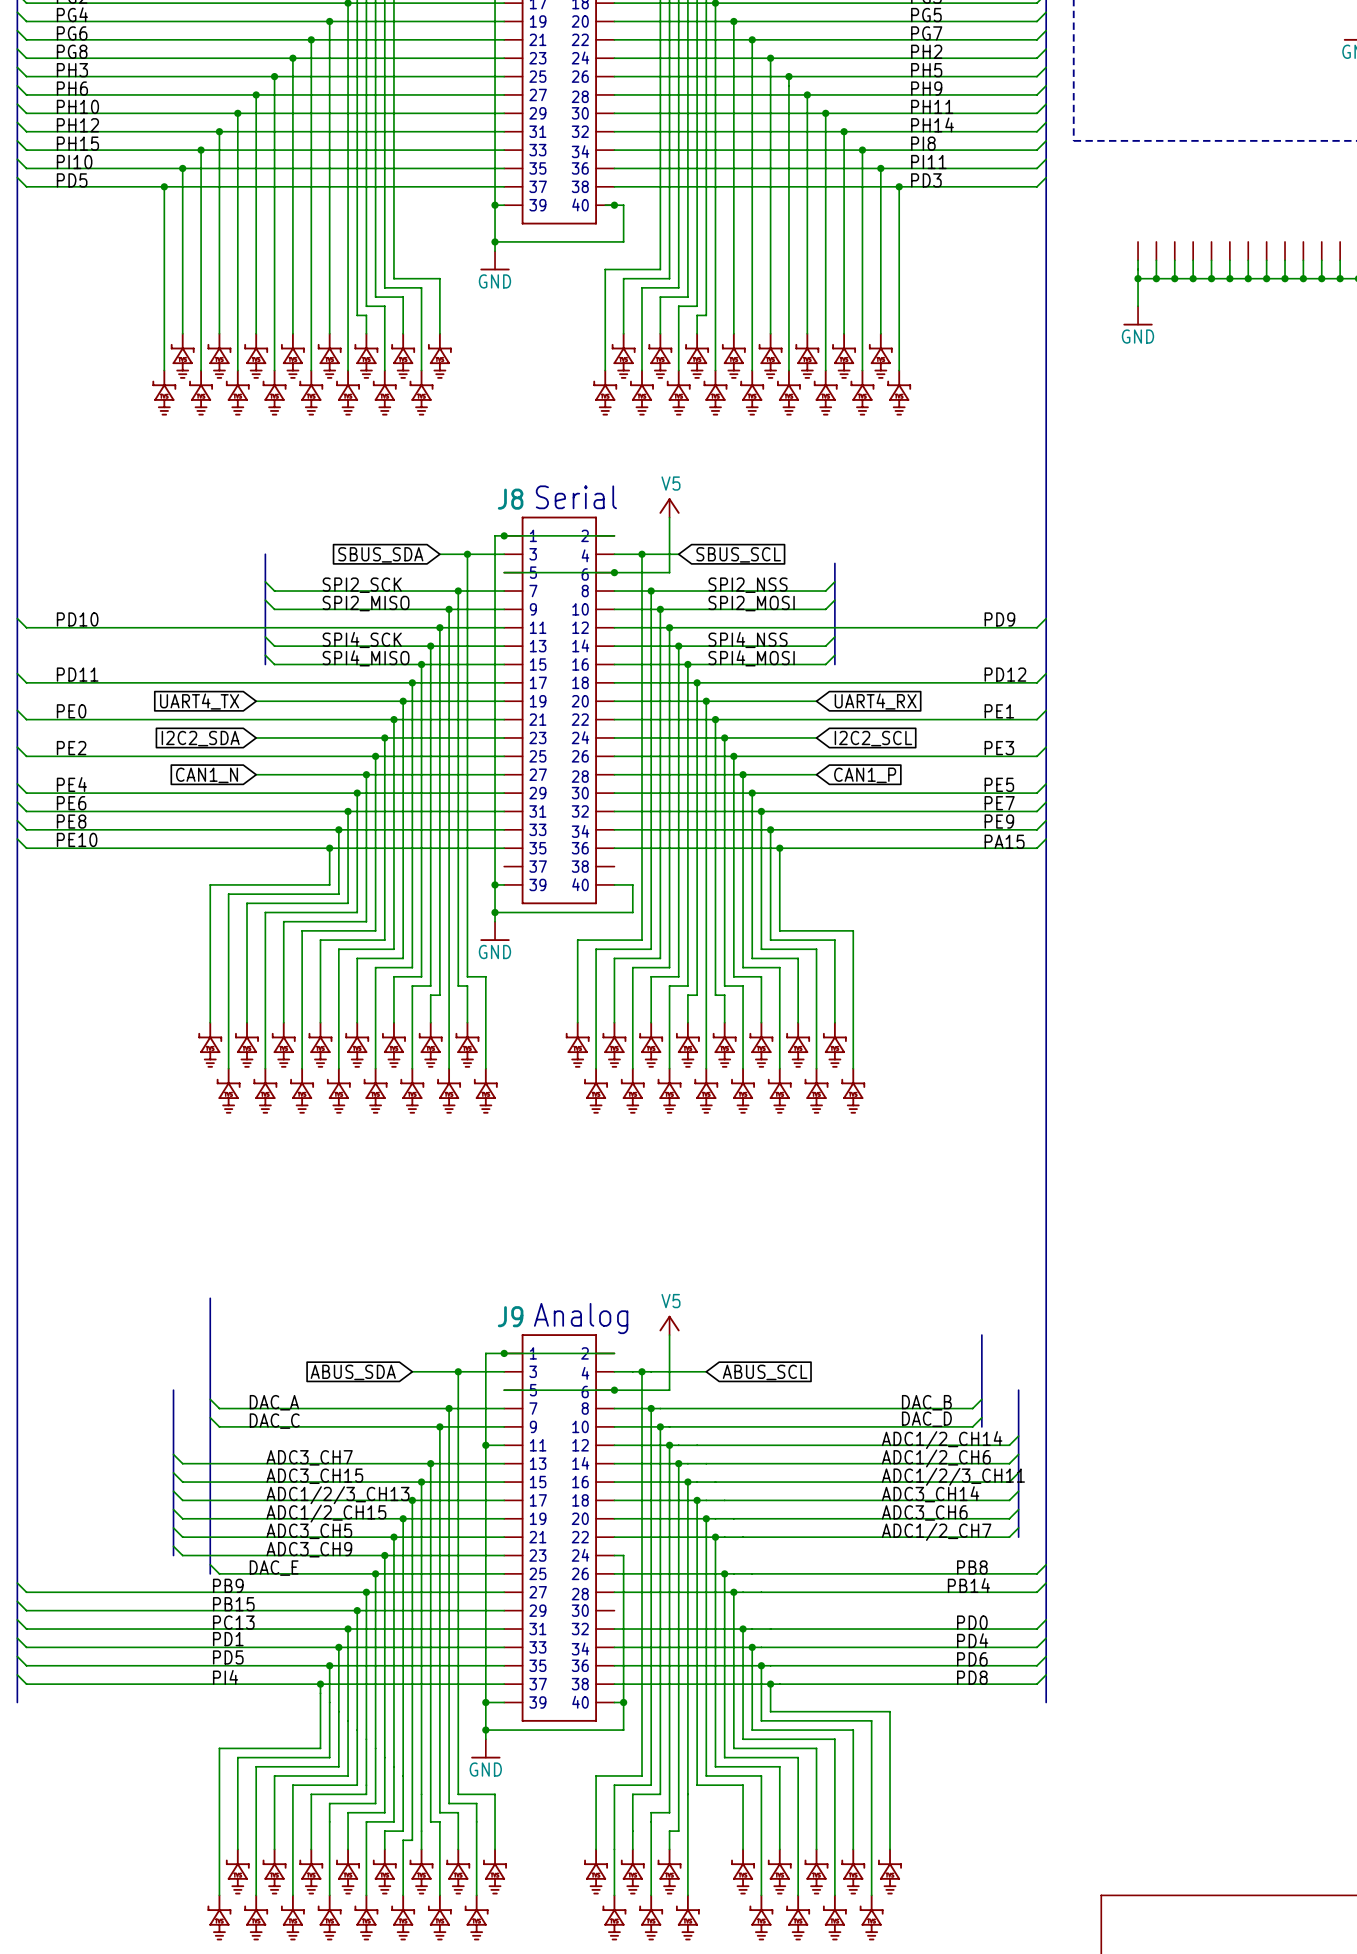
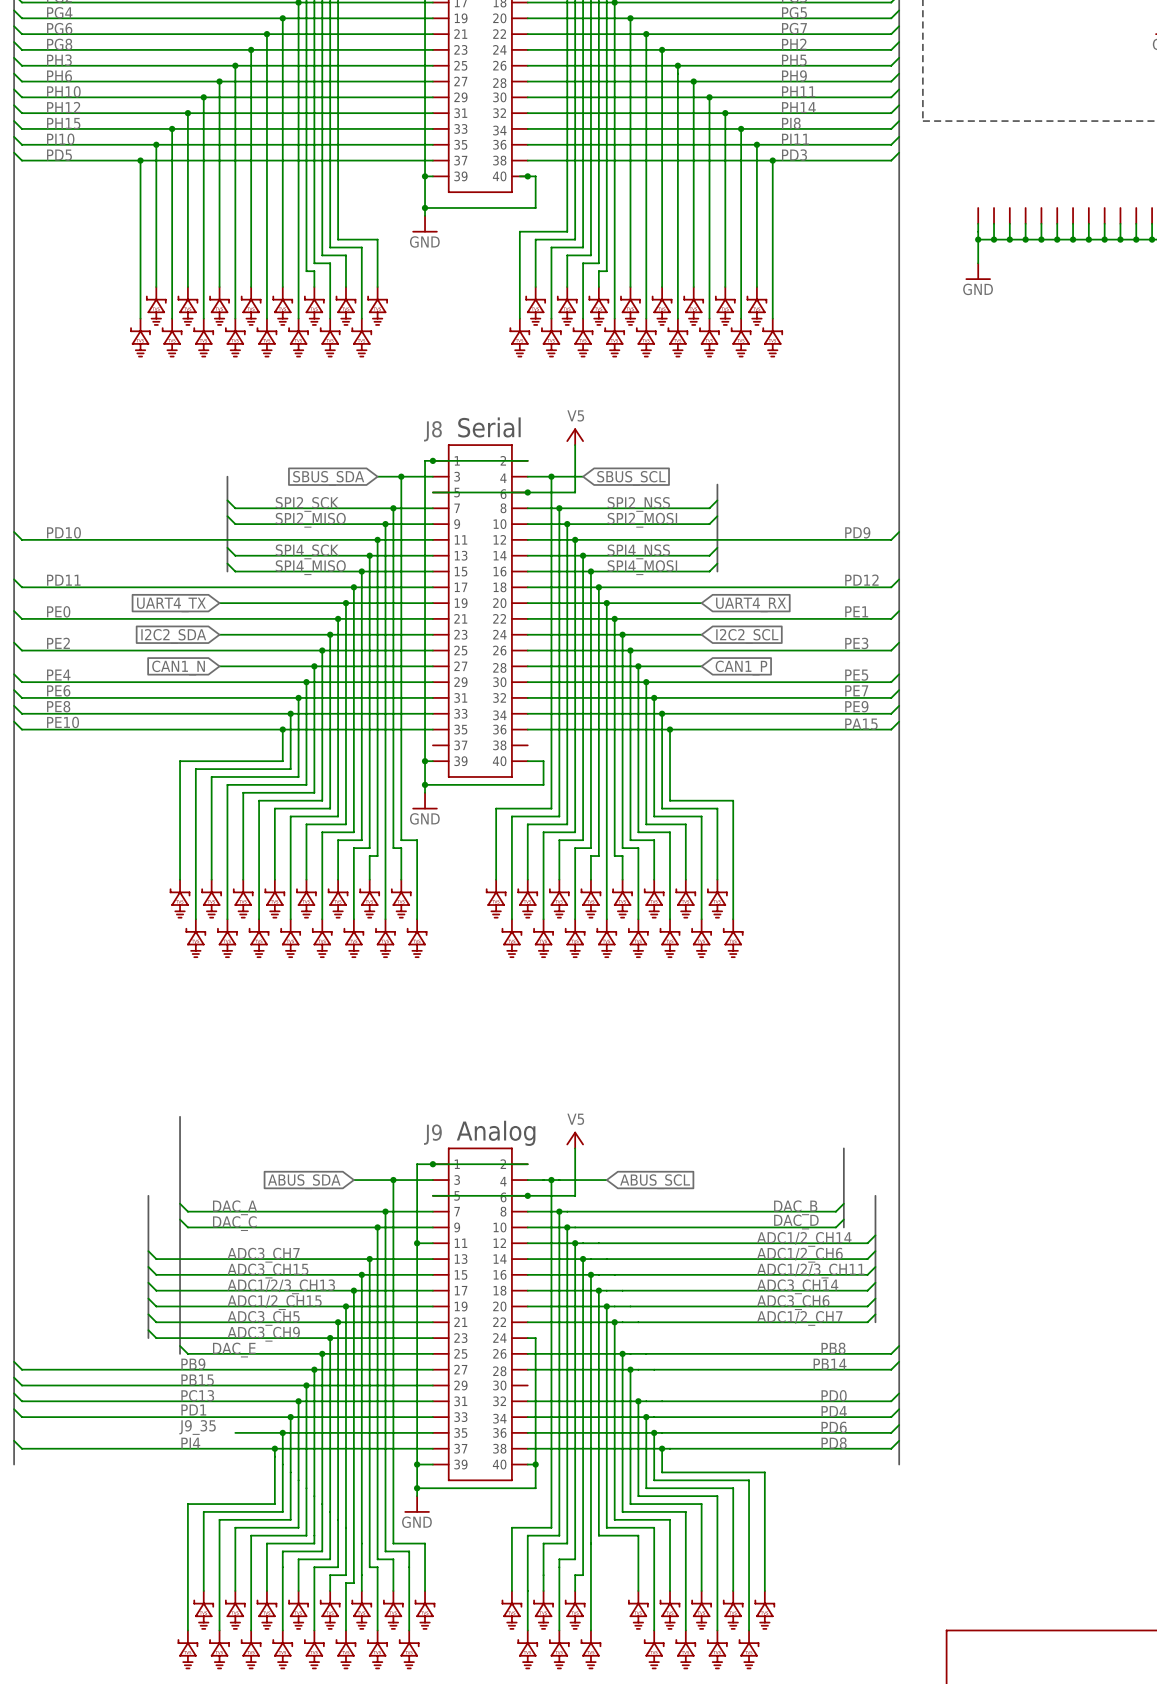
wire: (17, 1656) (26, 1665) (274, 1665) -> none
label: PD5 (228, 1657) -> J9_35 (197, 1427)

